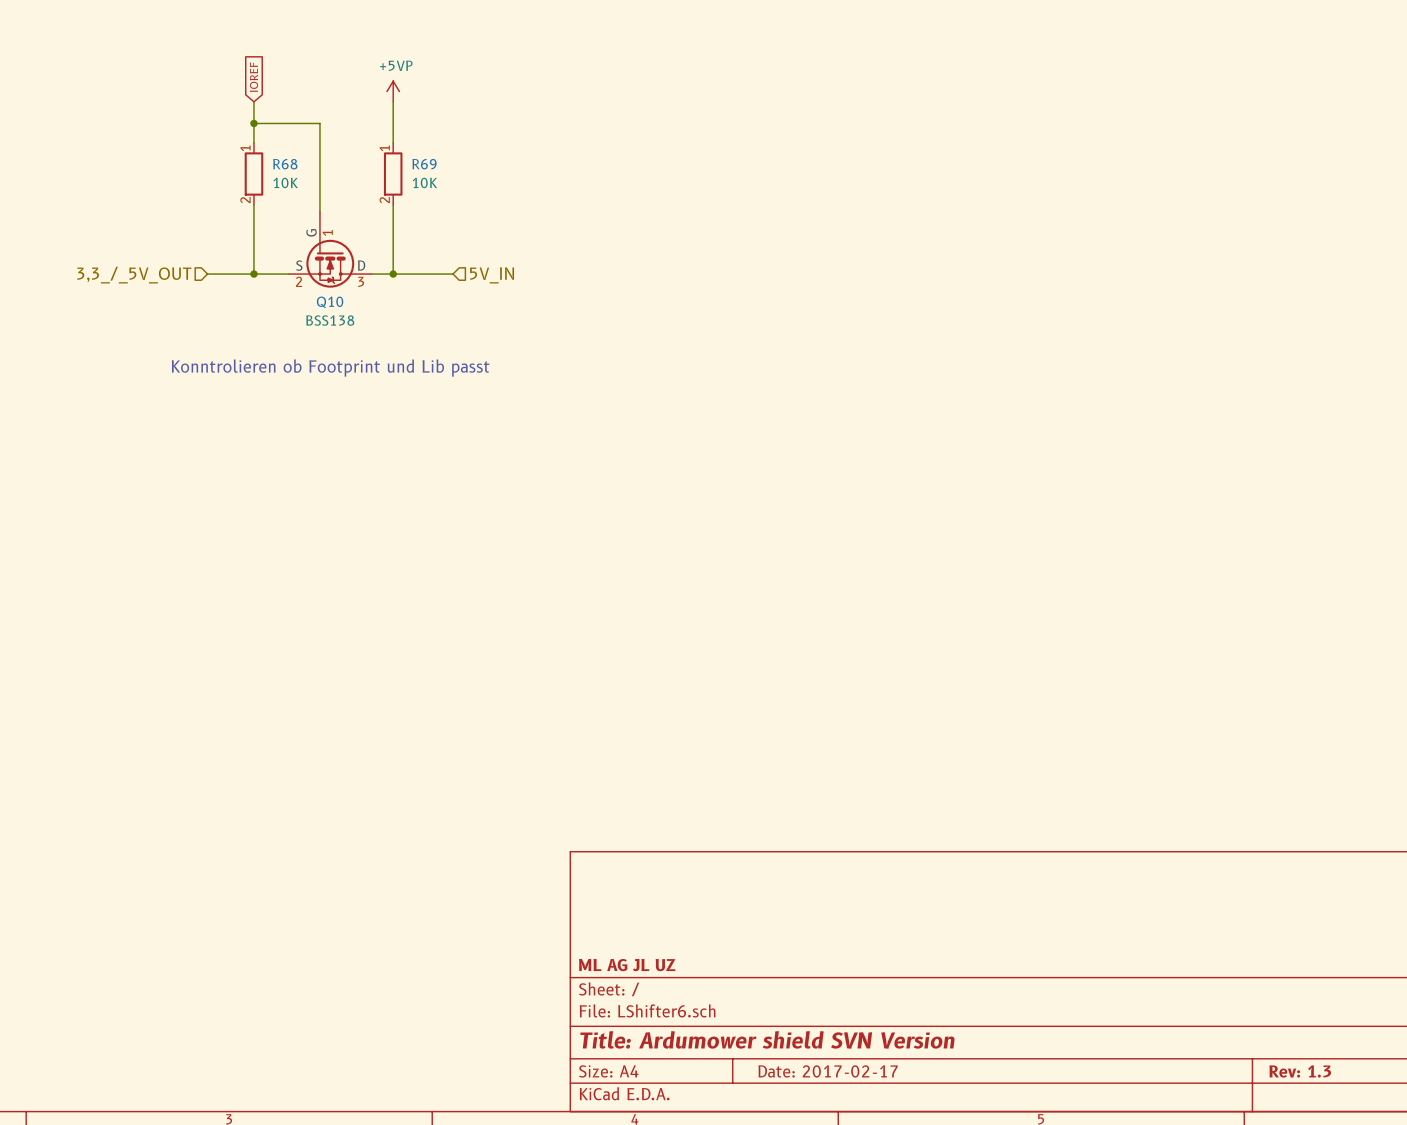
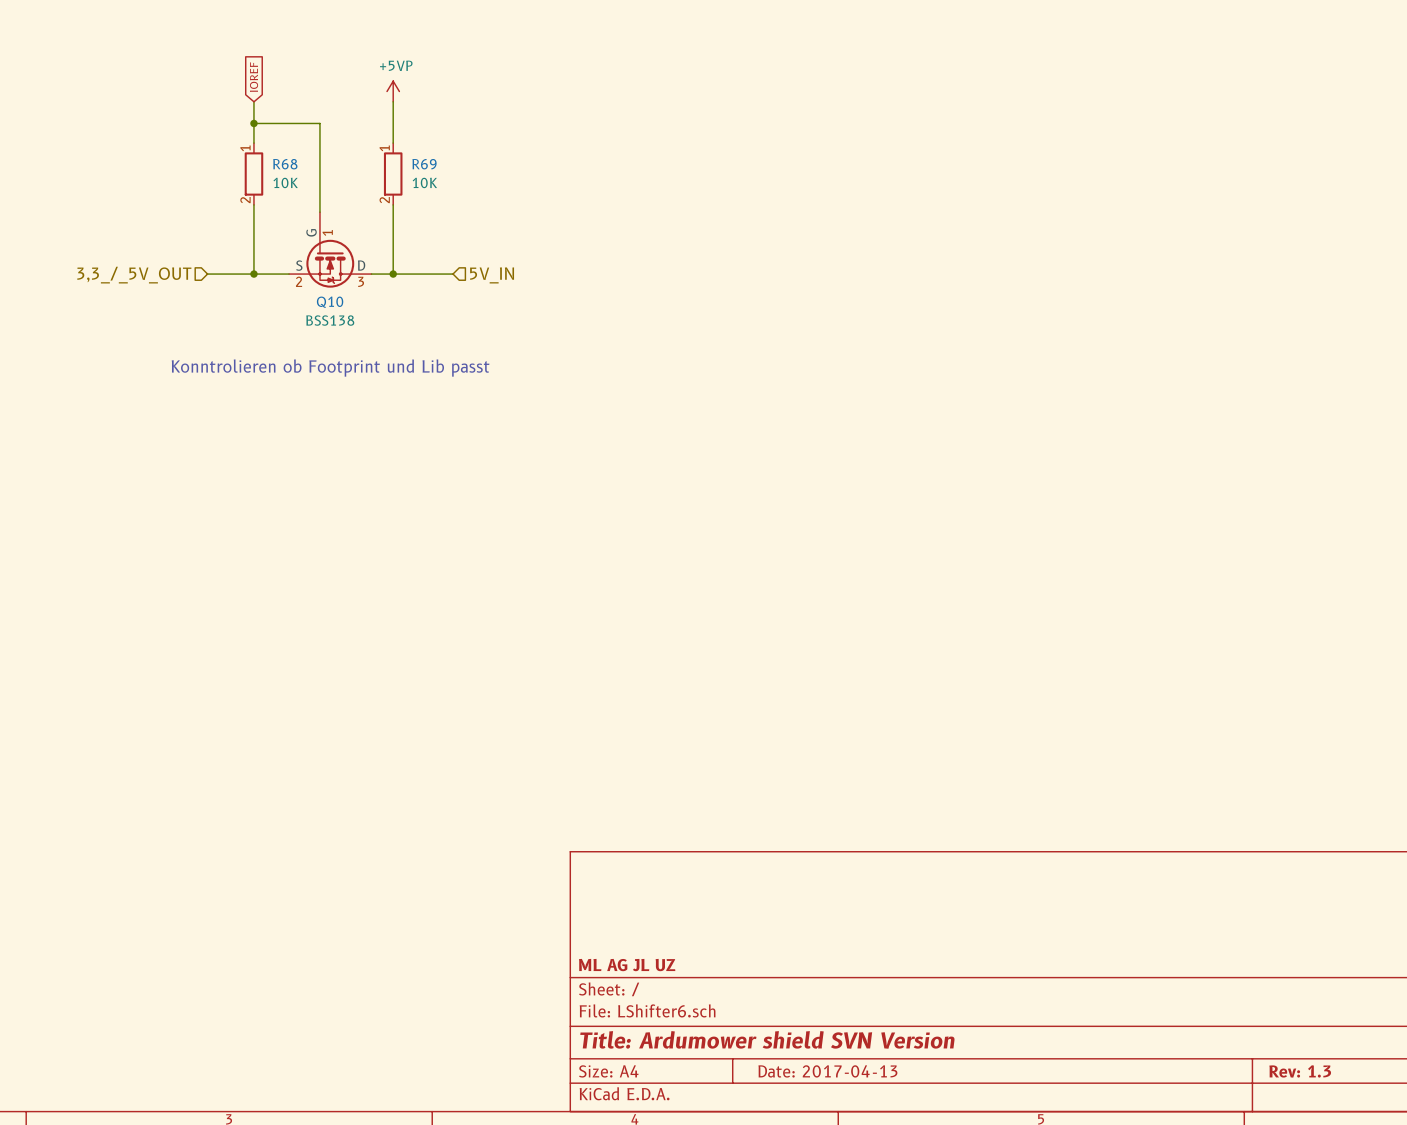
title block: Date: 2017-02-17 (828, 1071) -> Date: 2017-04-13 (827, 1071)

